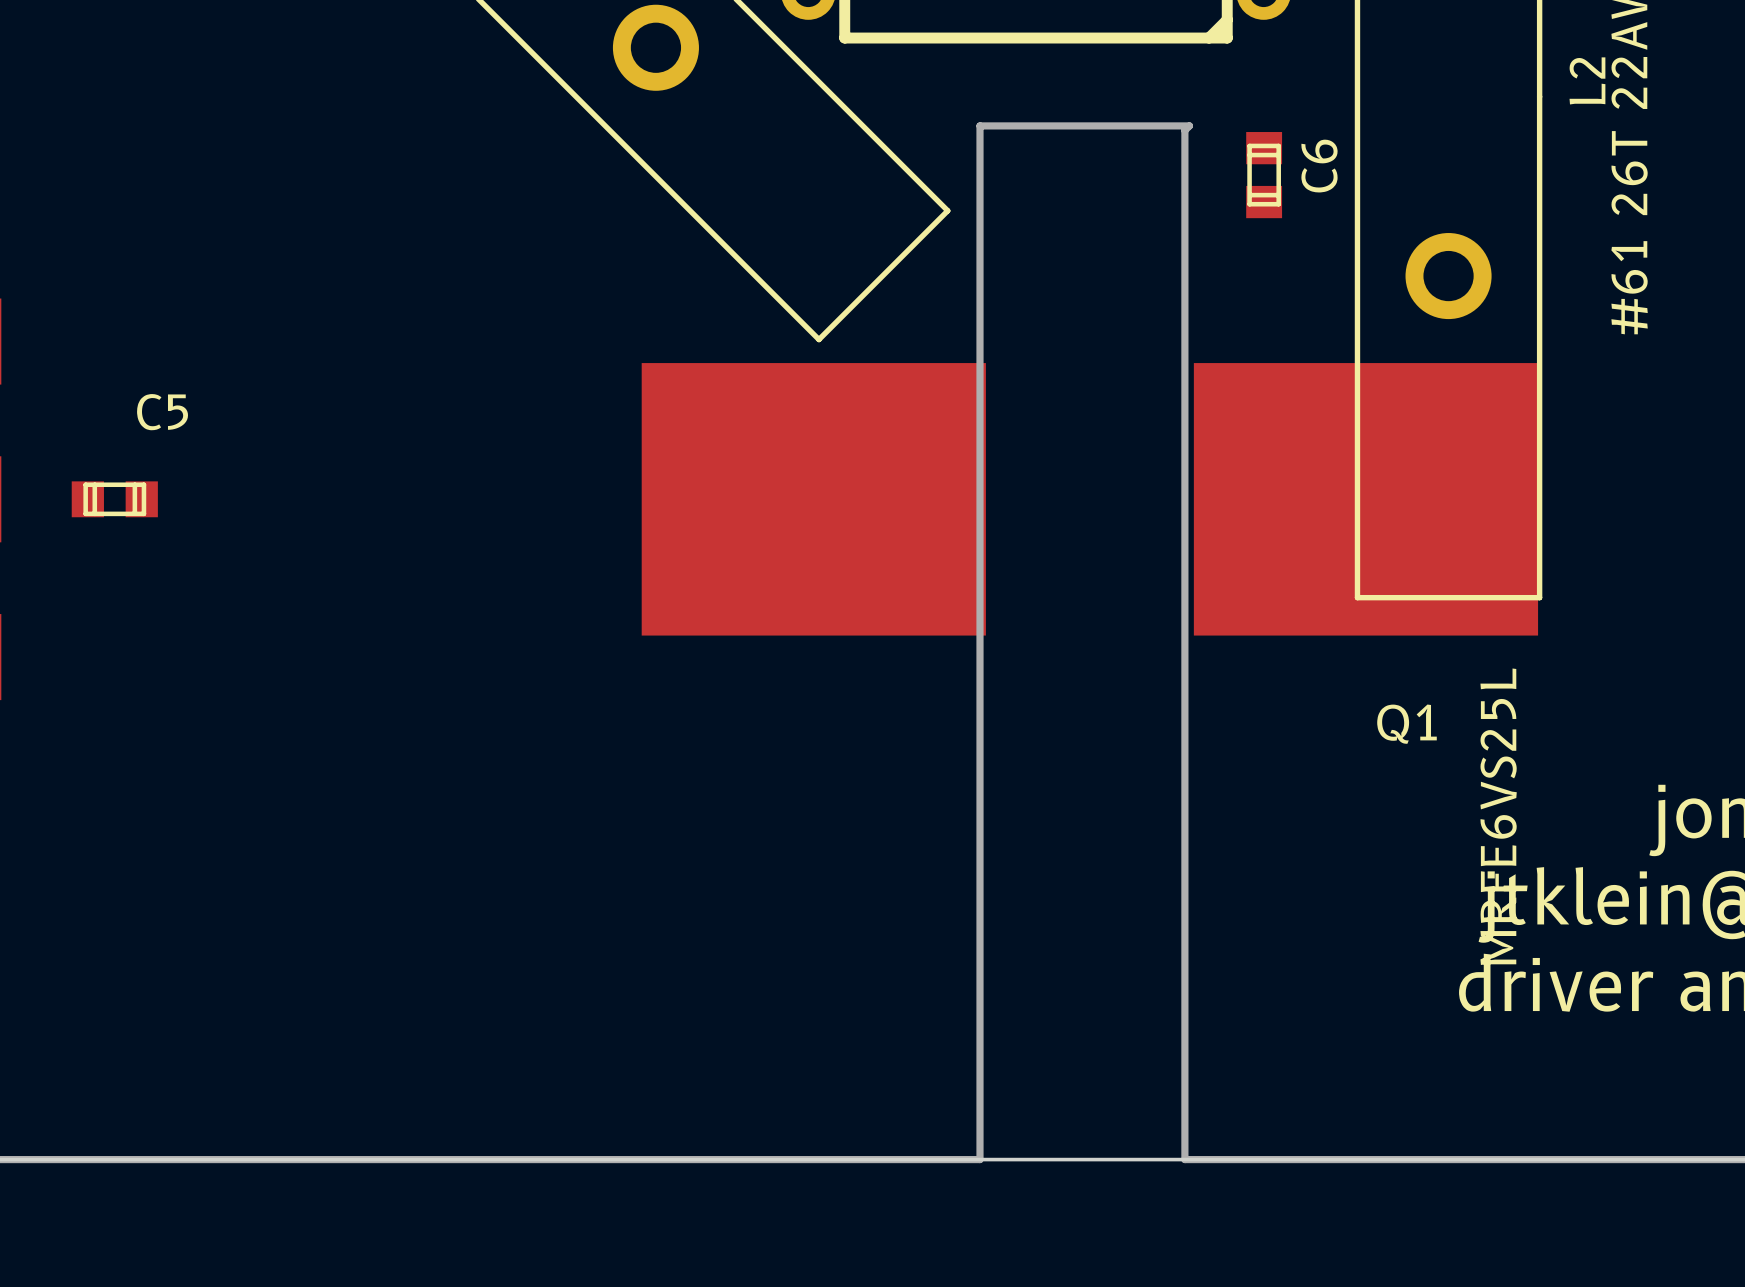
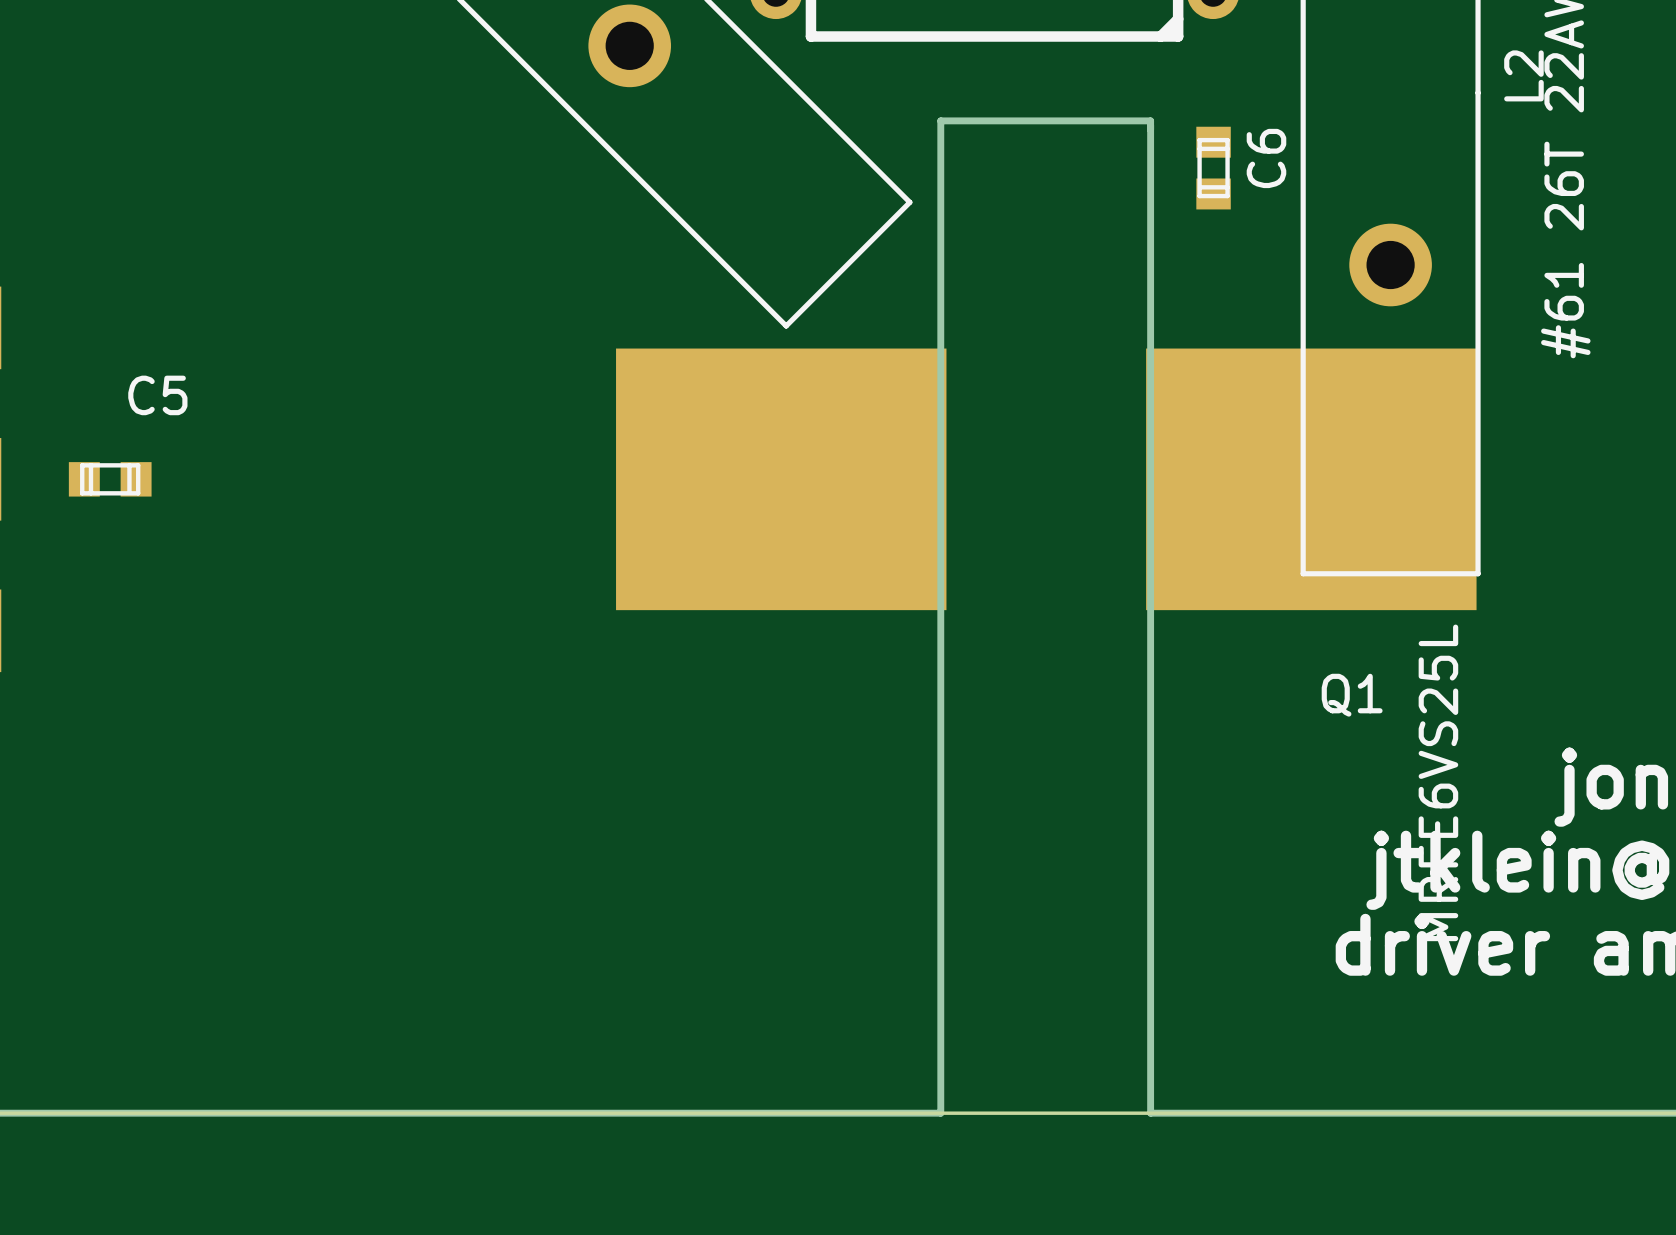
line: (1189, 125) (1184, 130) (1184, 1159) (1198, 1159) -> (1141, 120) (1150, 120) (1150, 1113)

